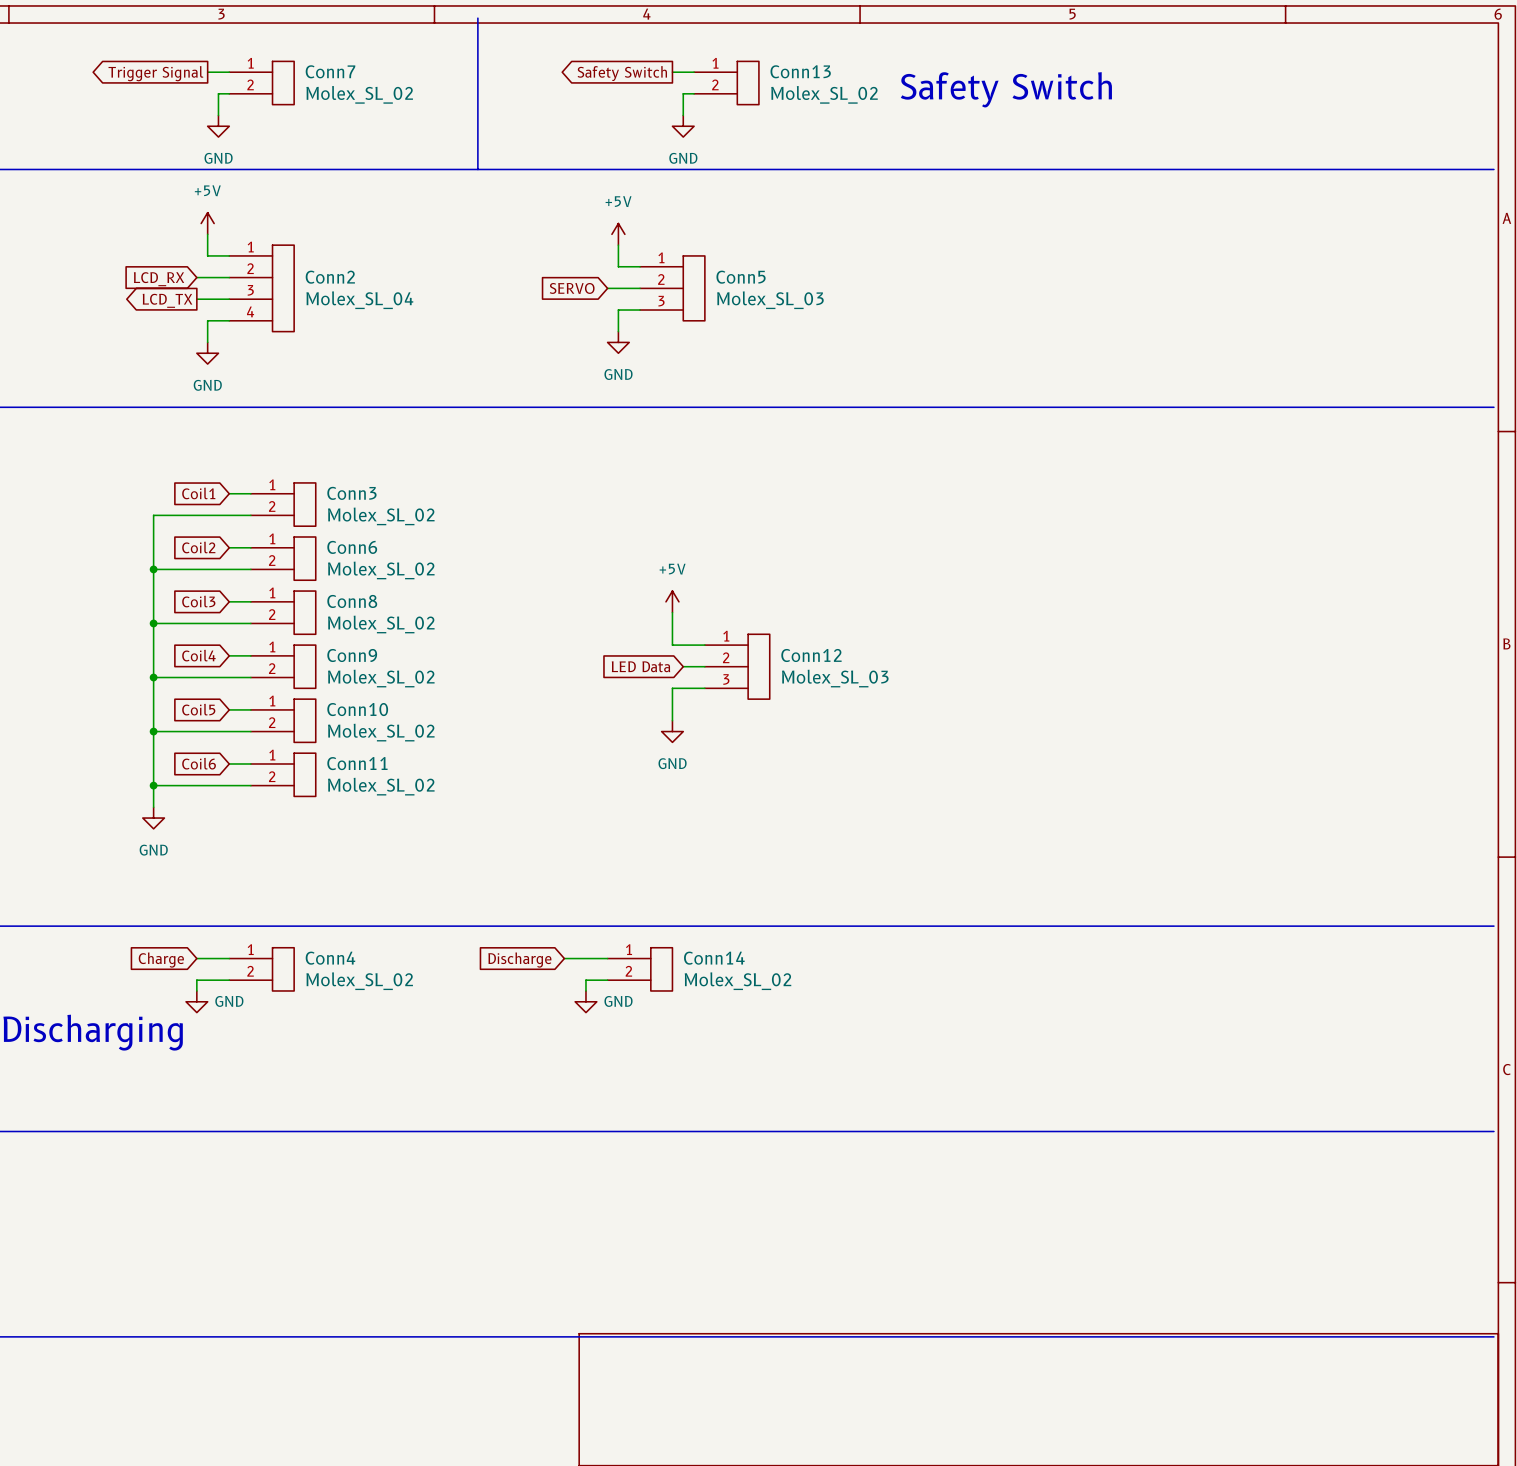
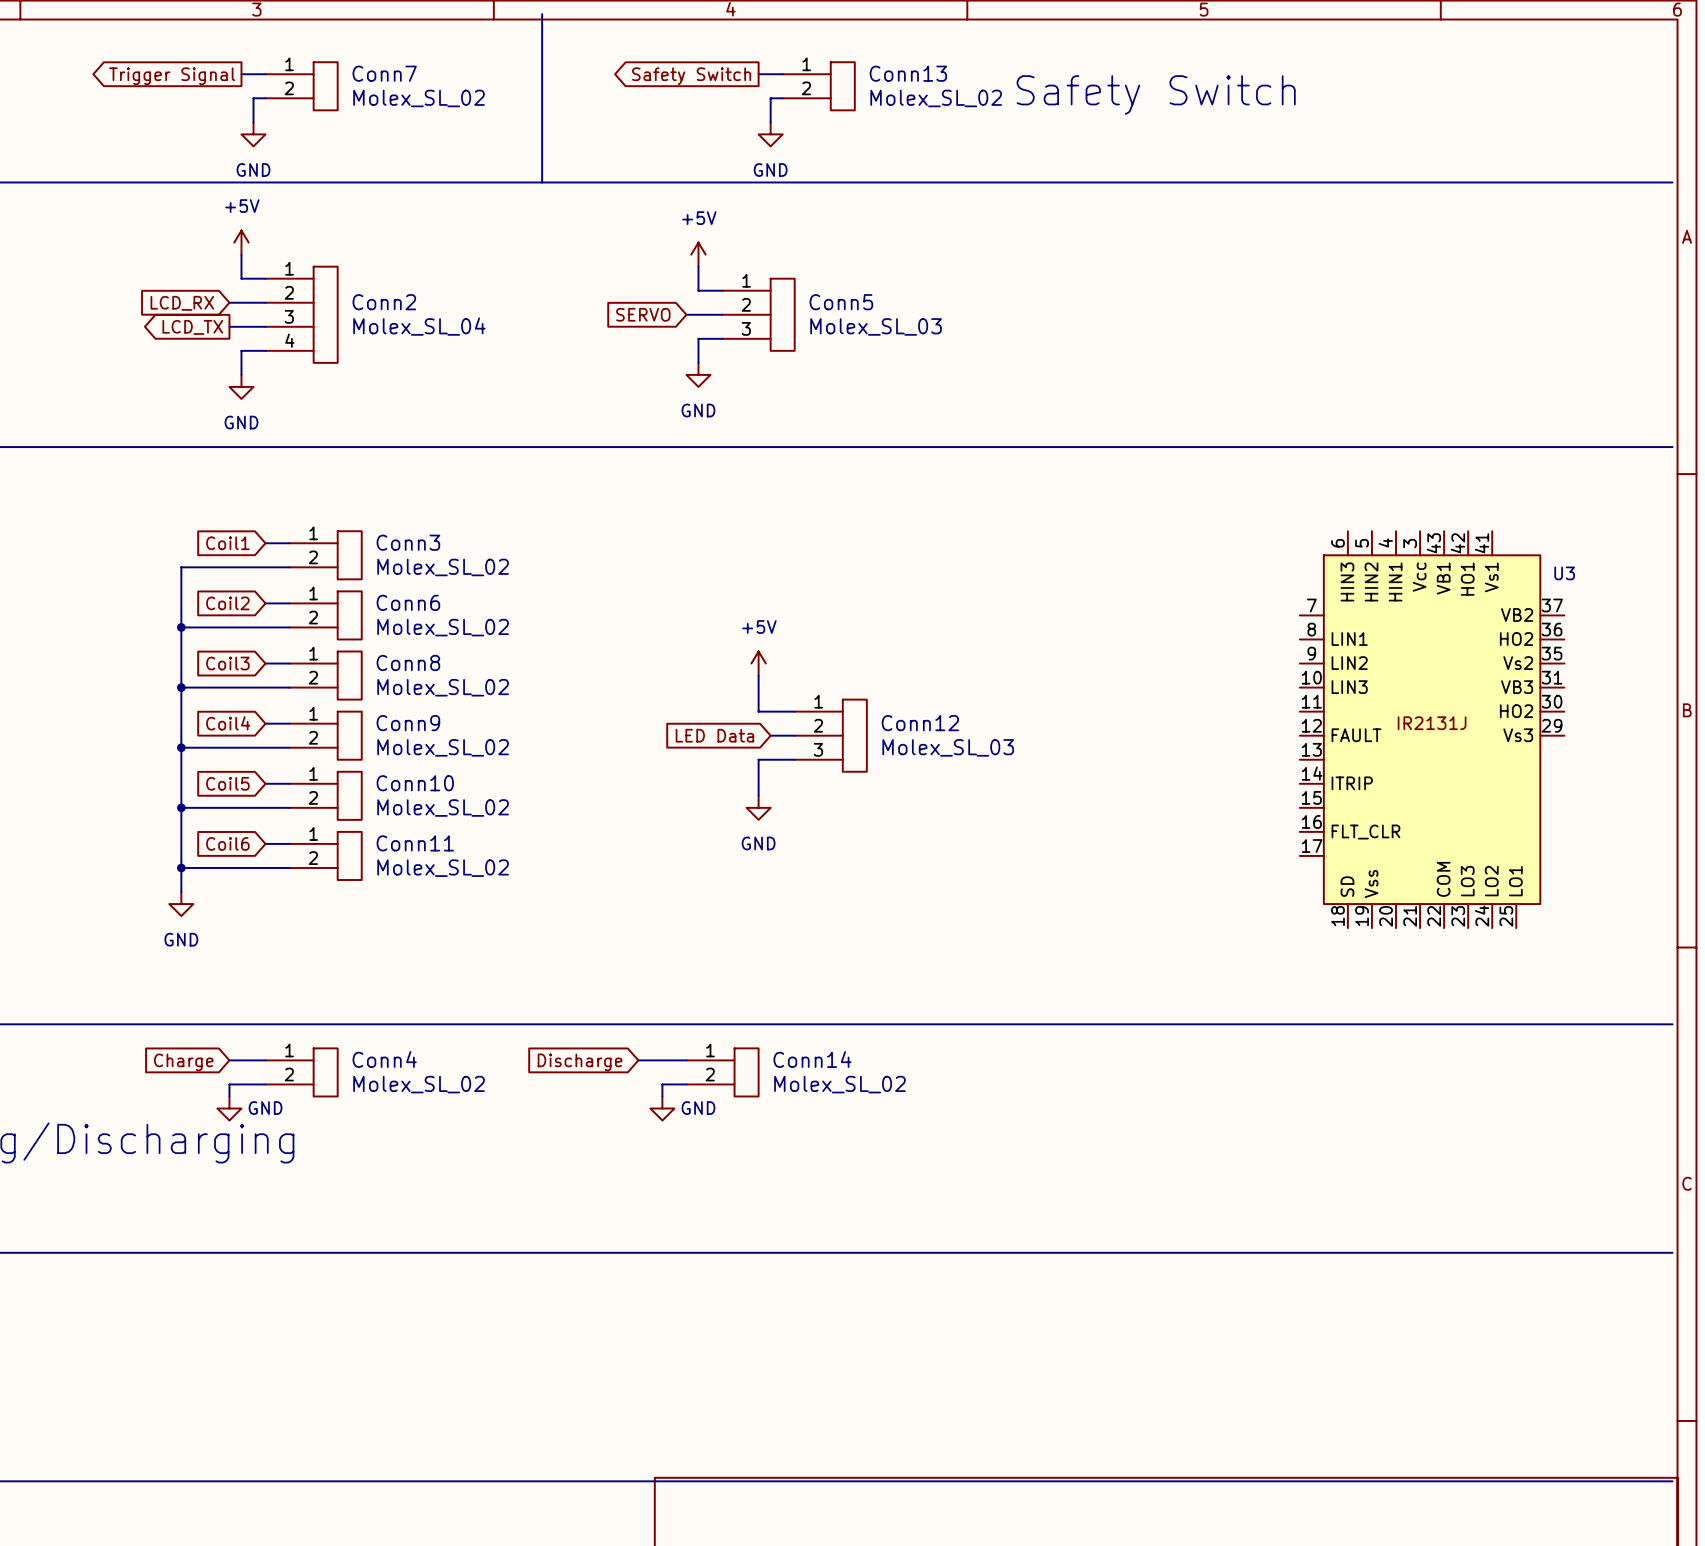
U3: none -> (1432, 729)

